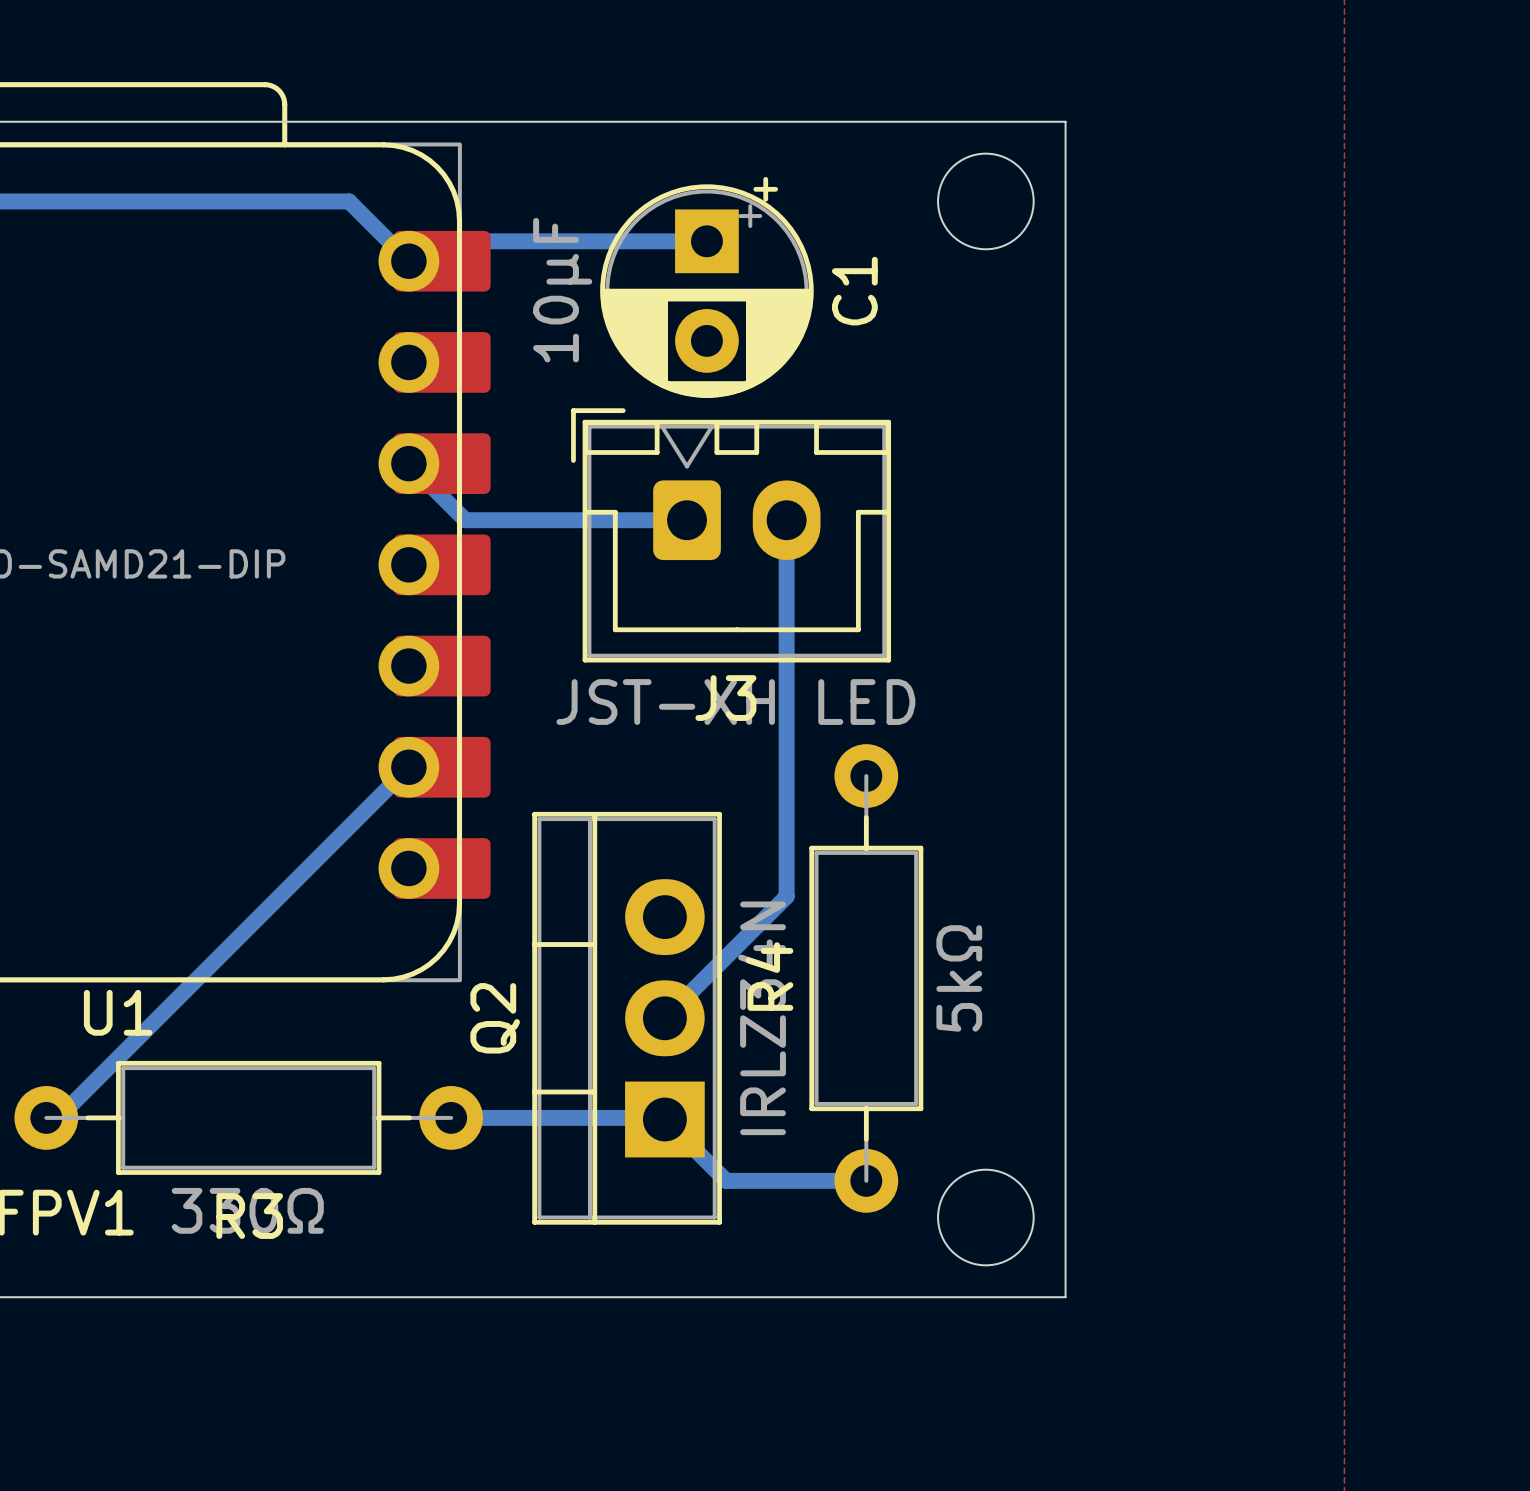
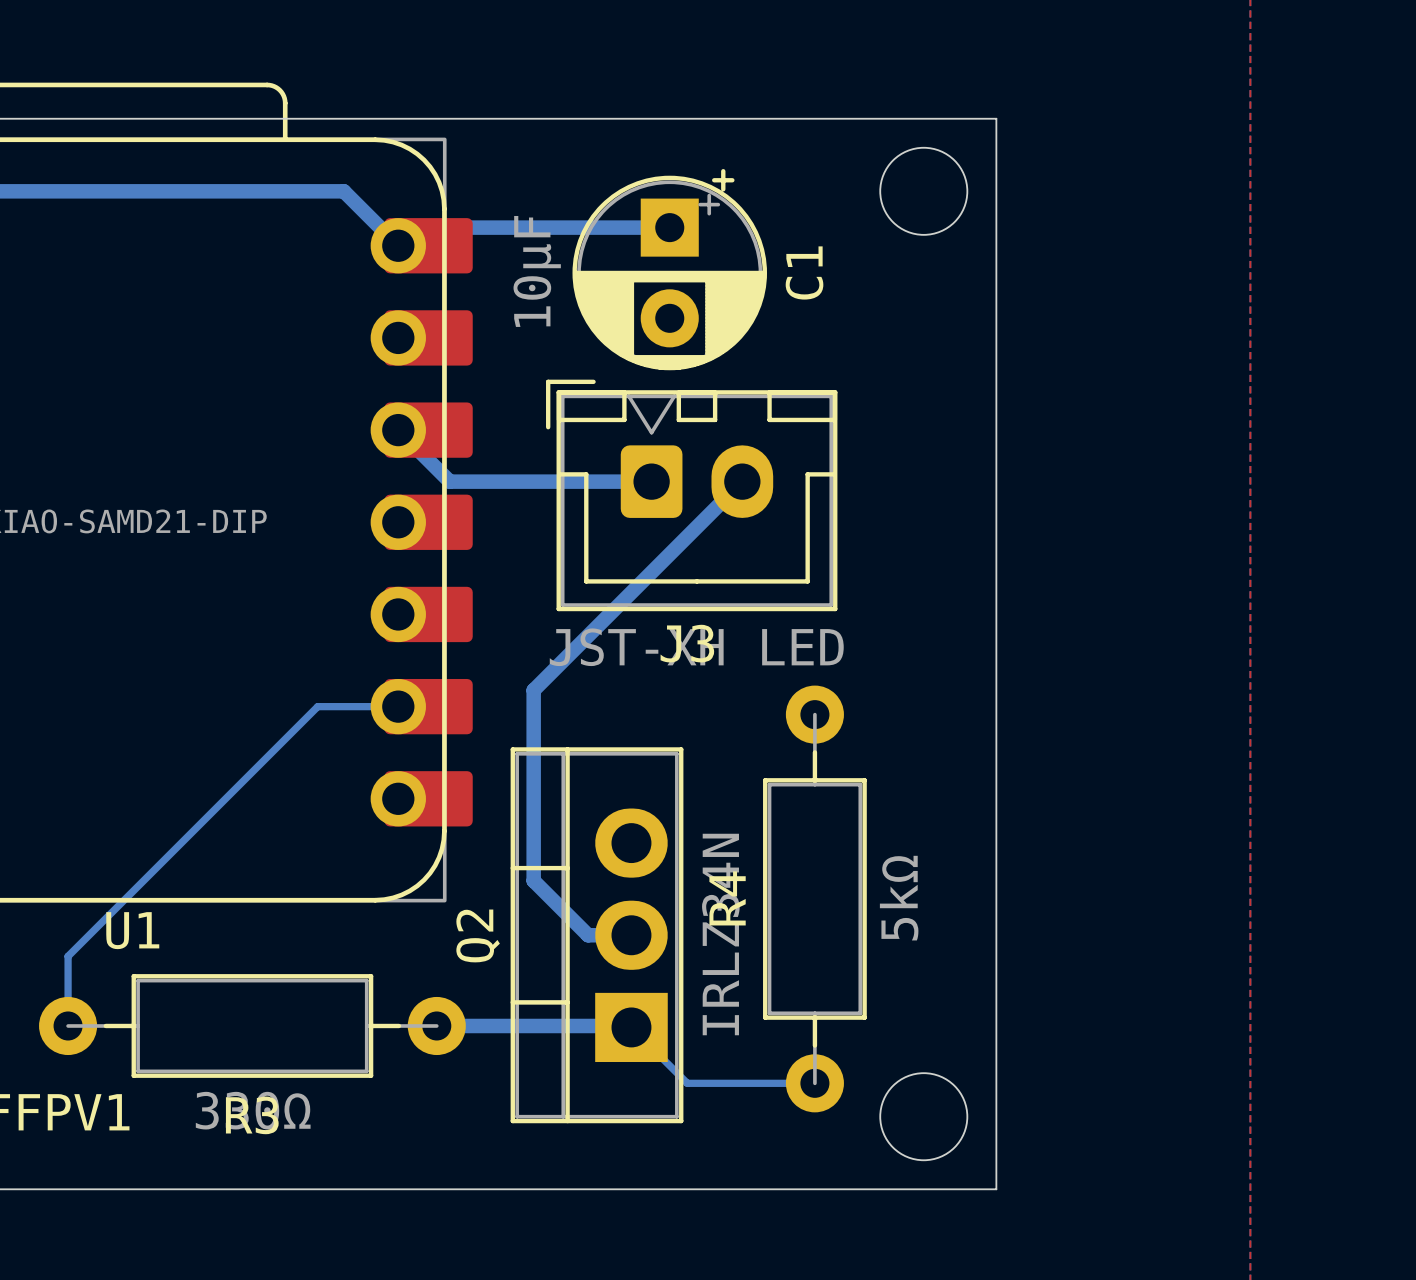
bottom track: (786, 520) (786, 896) (664, 1018) -> (742, 481) (533, 690) (533, 880) (588, 935) (631, 935)
bottom track: (408, 767) (58, 1117) (46, 1117) -> (398, 706) (317, 706) (68, 956) (68, 1025)
bottom track width: thick (664, 1119) (726, 1180) (866, 1180) -> thin (631, 1027) (687, 1083) (814, 1083)

